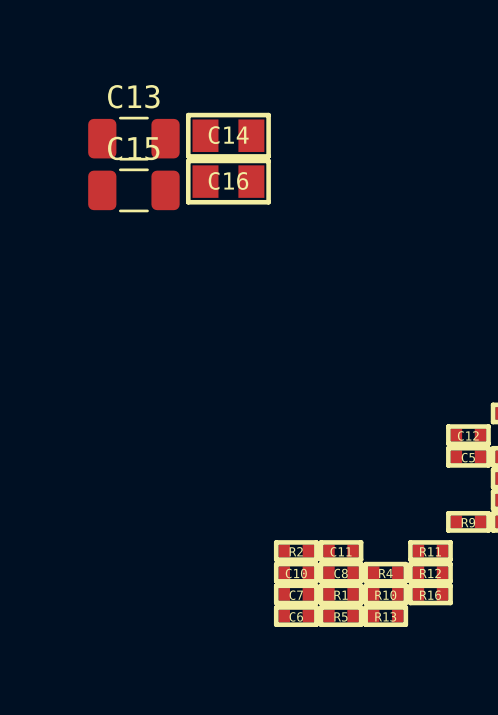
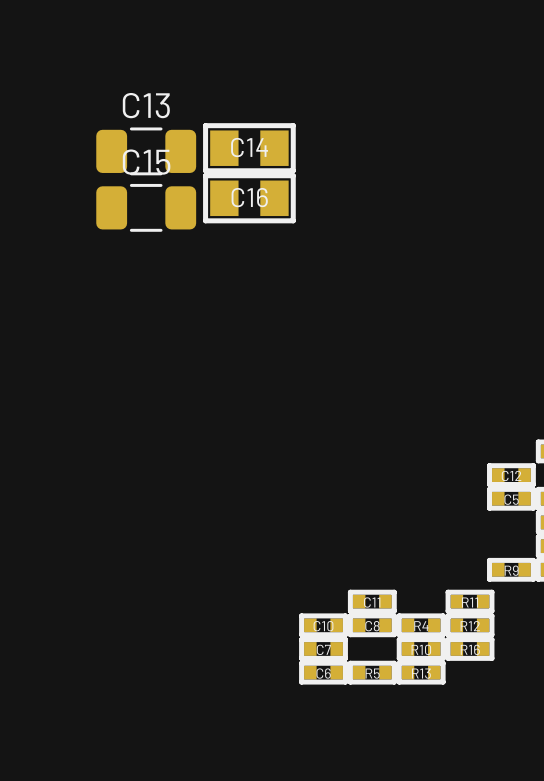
R2: (296, 551) -> none
R1: (341, 594) -> none

